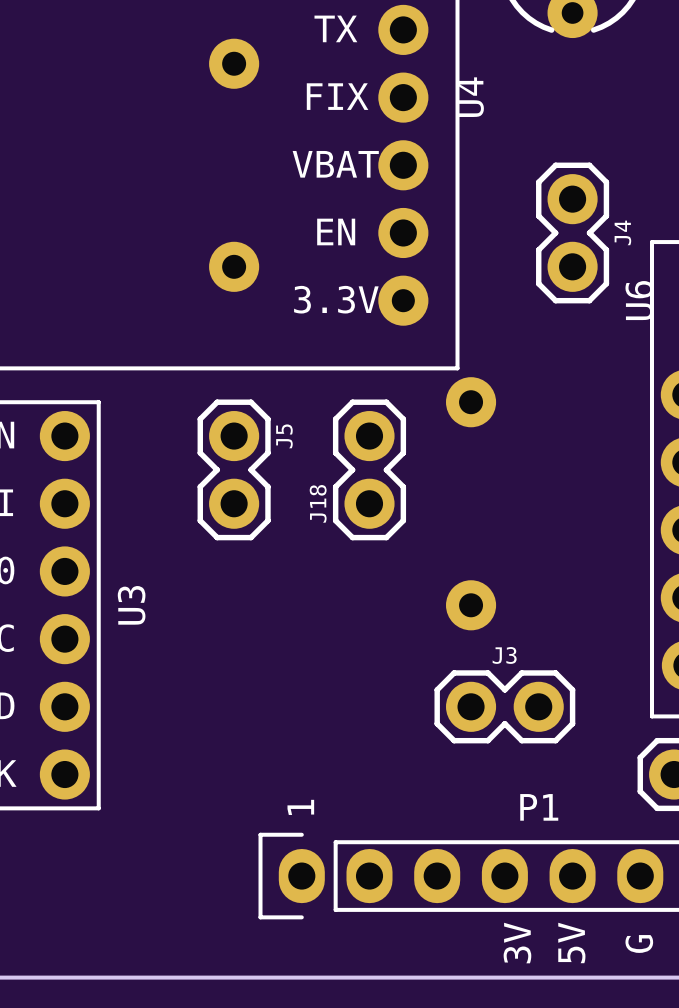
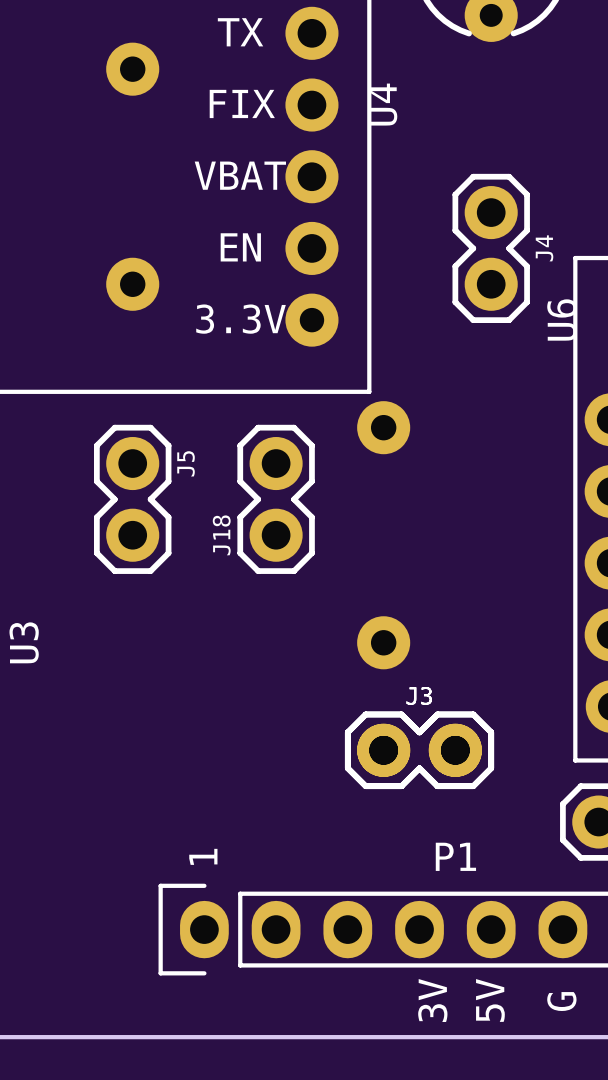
J3: none -> (419, 750)

